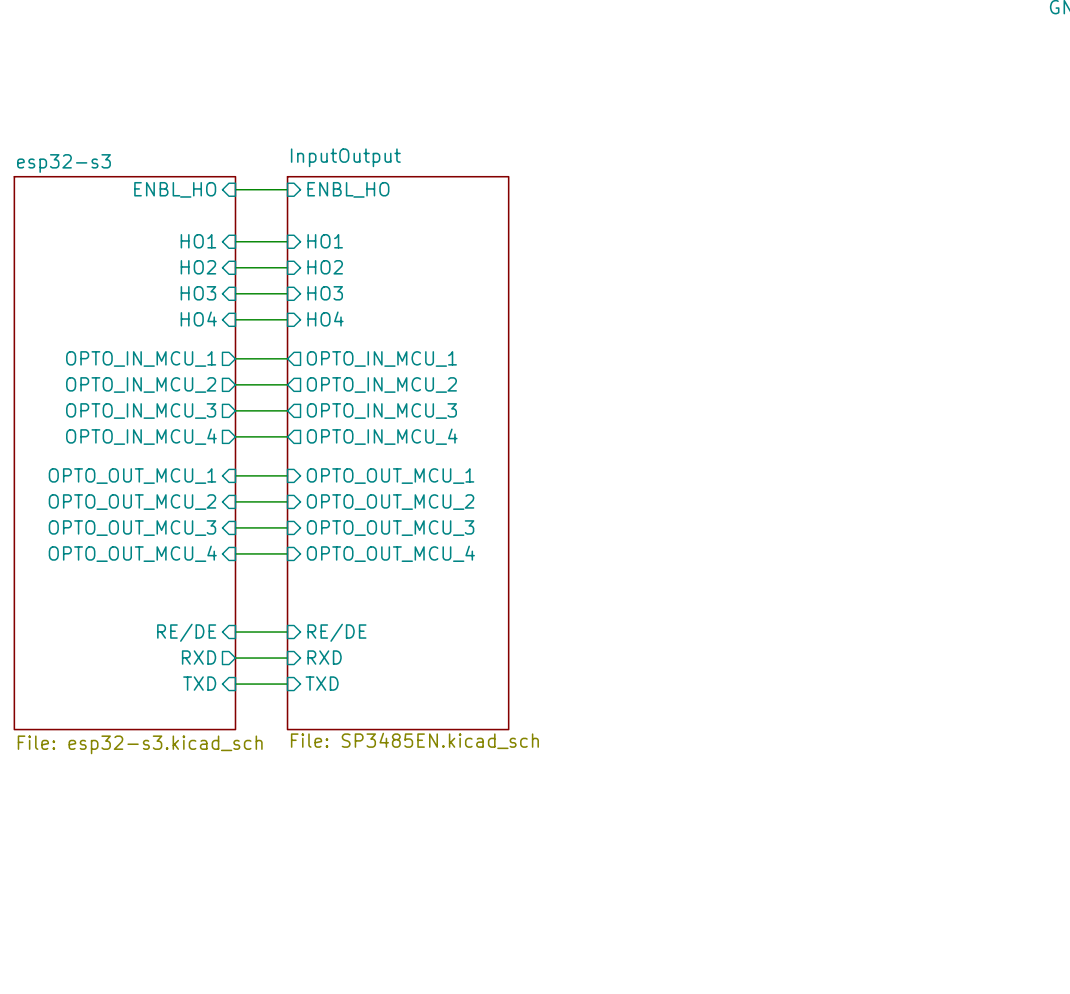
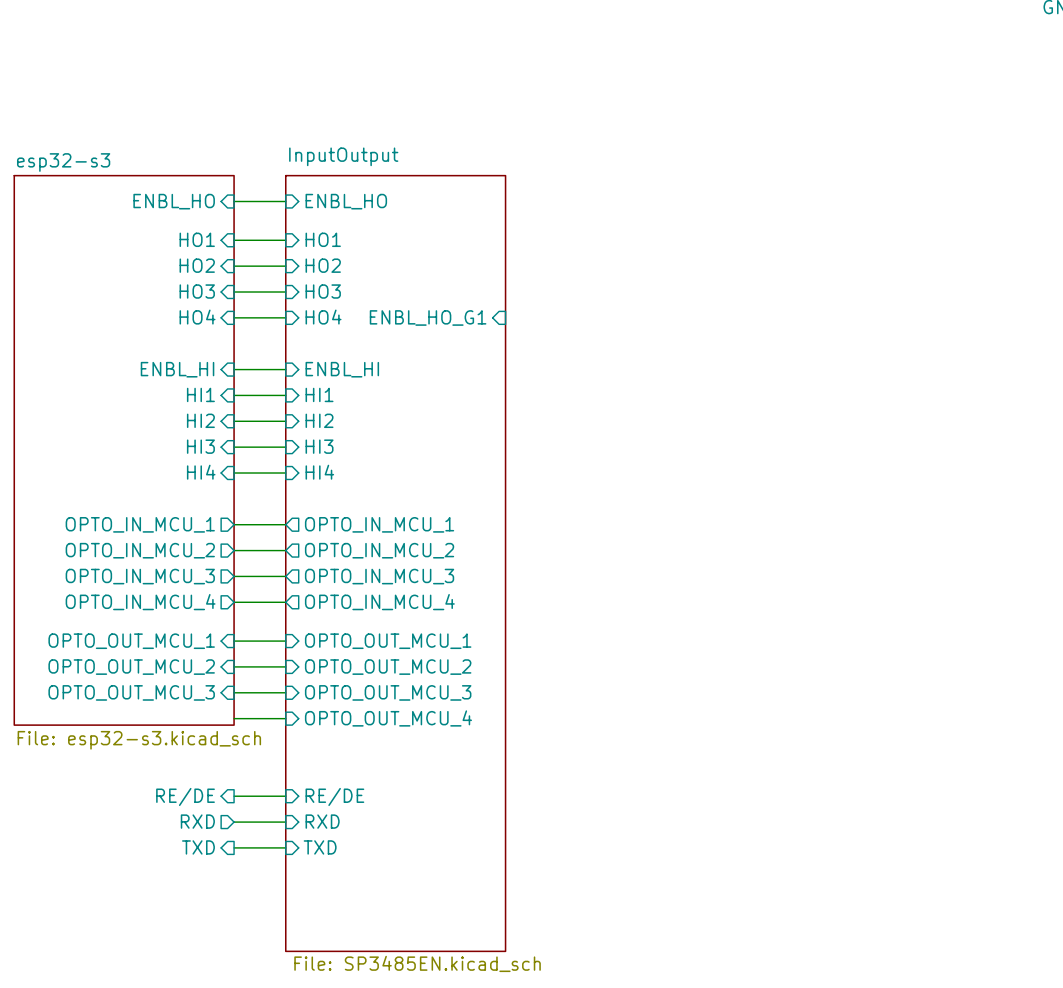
sheet pin position: ENBL_HO (175, 189) -> ENBL_HO (174, 201)
wire: (235, 189) (287, 189) -> (234, 201) (285, 201)
sheet pin position: ENBL_HO (348, 189) -> ENBL_HO (346, 201)
sheet pin: none -> ENBL_HO_G1 (428, 317)
sheet pin: OPTO_IN_MCU_1 (141, 358) -> none
wire: (235, 358) (287, 358) -> (234, 369) (285, 369)
sheet pin: OPTO_IN_MCU_1 (381, 358) -> none
sheet pin: none -> ENBL_HI (177, 369)
sheet pin: none -> ENBL_HI (342, 369)
sheet pin: OPTO_IN_MCU_2 (141, 384) -> none
wire: (235, 384) (287, 384) -> (234, 395) (285, 395)
sheet pin: OPTO_IN_MCU_2 (381, 384) -> none
sheet pin: none -> HI1 (200, 394)
sheet pin: none -> HI1 (319, 394)
wire: (235, 410) (287, 410) -> (234, 421) (285, 421)
sheet pin: OPTO_IN_MCU_3 (141, 411) -> none
sheet pin: OPTO_IN_MCU_3 (381, 411) -> none
sheet pin: none -> HI2 (200, 420)
sheet pin: none -> HI2 (319, 420)
sheet pin: OPTO_IN_MCU_4 (141, 436) -> none
wire: (235, 436) (287, 436) -> (234, 447) (285, 447)
sheet pin: OPTO_IN_MCU_4 (382, 436) -> none
sheet pin: none -> HI3 (200, 446)
sheet pin: none -> HI3 (319, 446)
sheet InputOutput: File: SP3485EN.kicad_sch (398, 453) -> none
sheet pin: OPTO_OUT_MCU_1 (132, 476) -> HI4 (201, 472)
sheet pin: OPTO_OUT_MCU_1 (390, 476) -> HI4 (319, 472)
wire: (235, 501) (287, 501) -> (234, 718) (285, 718)
sheet pin: OPTO_OUT_MCU_2 (132, 502) -> none
sheet pin: OPTO_OUT_MCU_2 (390, 502) -> none
sheet pin shape: input (132, 528) -> output (140, 524)
sheet pin: OPTO_OUT_MCU_3 (132, 528) -> OPTO_IN_MCU_1 (140, 524)
sheet pin shape: input (390, 528) -> output (379, 524)
sheet pin: OPTO_OUT_MCU_3 (390, 528) -> OPTO_IN_MCU_1 (379, 524)
sheet pin shape: input (132, 553) -> output (140, 550)
sheet pin: OPTO_OUT_MCU_4 (132, 553) -> OPTO_IN_MCU_2 (140, 550)
sheet pin shape: input (390, 553) -> output (379, 550)
sheet pin: OPTO_OUT_MCU_4 (390, 553) -> OPTO_IN_MCU_2 (379, 550)
sheet InputOutput: none -> File: SP3485EN.kicad_sch (395, 563)
wire: none -> (234, 576) (285, 576)
sheet pin: none -> OPTO_IN_MCU_3 (140, 576)
sheet pin: none -> OPTO_IN_MCU_3 (379, 576)
sheet pin: none -> OPTO_IN_MCU_4 (140, 602)
wire: none -> (234, 602) (285, 602)
sheet pin: none -> OPTO_IN_MCU_4 (379, 602)
sheet pin: RE/DE (186, 632) -> none
wire: (235, 632) (287, 632) -> (234, 641) (285, 641)
sheet pin: RE/DE (336, 632) -> none
sheet pin: none -> OPTO_OUT_MCU_1 (131, 641)
sheet pin: none -> OPTO_OUT_MCU_1 (388, 641)
sheet pin: RXD (199, 657) -> none
sheet pin: RXD (324, 657) -> none
wire: (235, 658) (287, 658) -> (234, 666) (285, 666)
sheet pin: none -> OPTO_OUT_MCU_2 (131, 667)
sheet pin: none -> OPTO_OUT_MCU_2 (388, 667)
sheet pin: TXD (199, 683) -> none
sheet pin: TXD (322, 683) -> none
wire: (235, 684) (287, 684) -> (234, 692) (285, 692)
sheet pin: none -> OPTO_OUT_MCU_3 (131, 692)
sheet pin: none -> OPTO_OUT_MCU_3 (388, 692)
sheet pin: none -> OPTO_OUT_MCU_4 (388, 718)
sheet pin: none -> RE/DE (185, 796)
wire: none -> (234, 796) (285, 796)
sheet pin: none -> RE/DE (334, 796)
sheet pin: none -> RXD (197, 821)
sheet pin: none -> RXD (322, 821)
wire: none -> (234, 822) (285, 822)
sheet pin: none -> TXD (198, 847)
sheet pin: none -> TXD (320, 847)
wire: none -> (234, 847) (285, 847)

